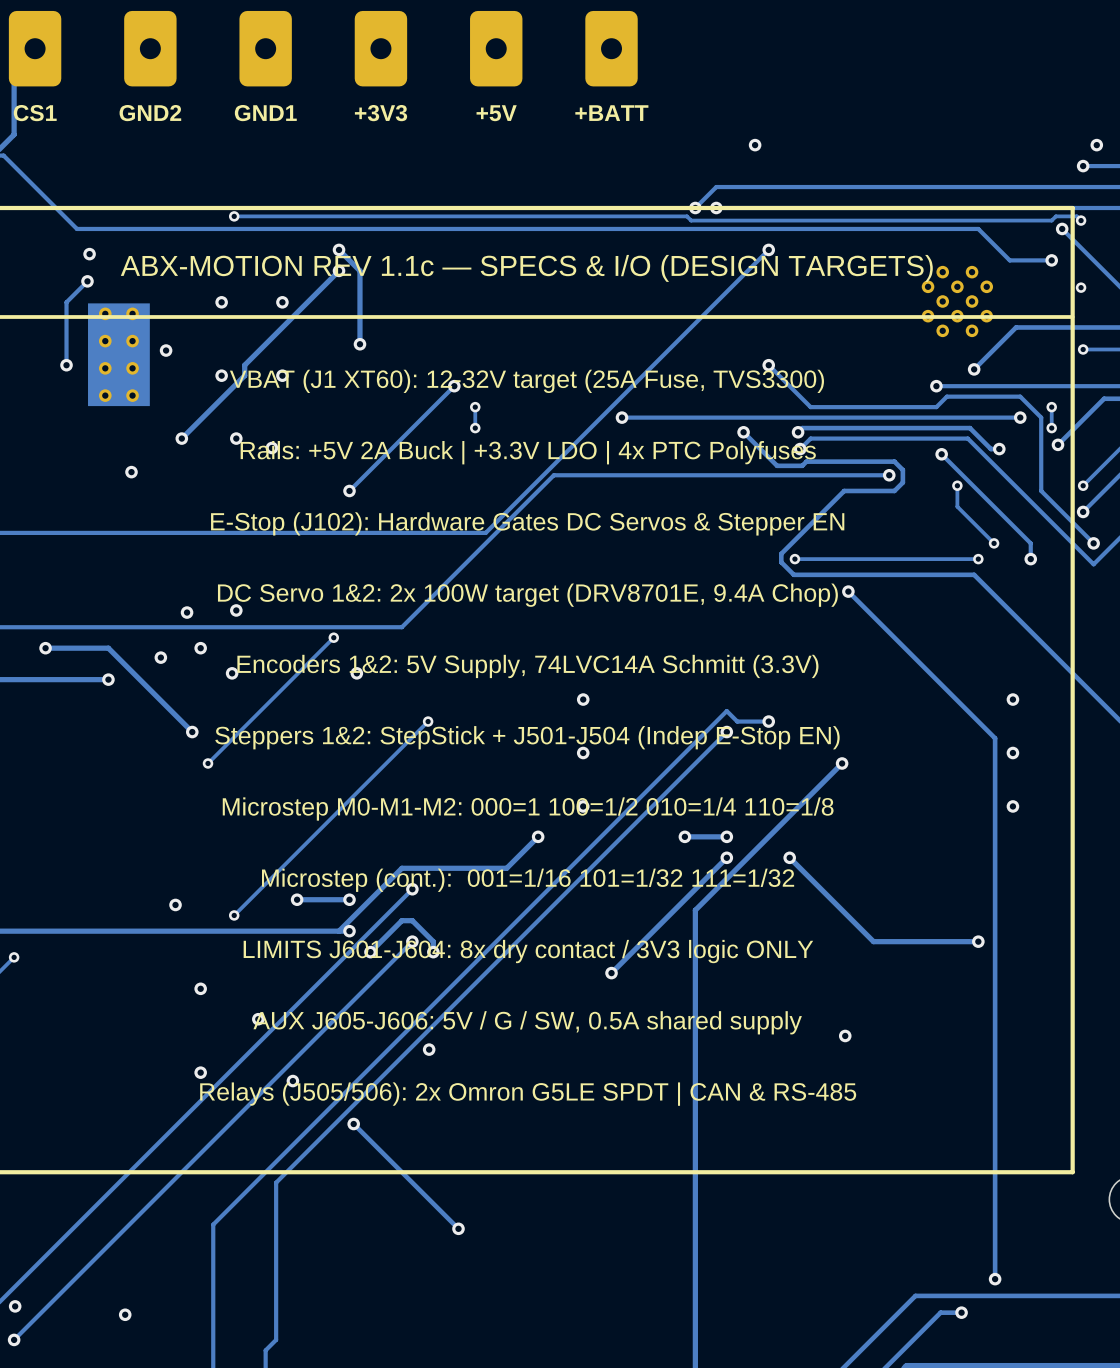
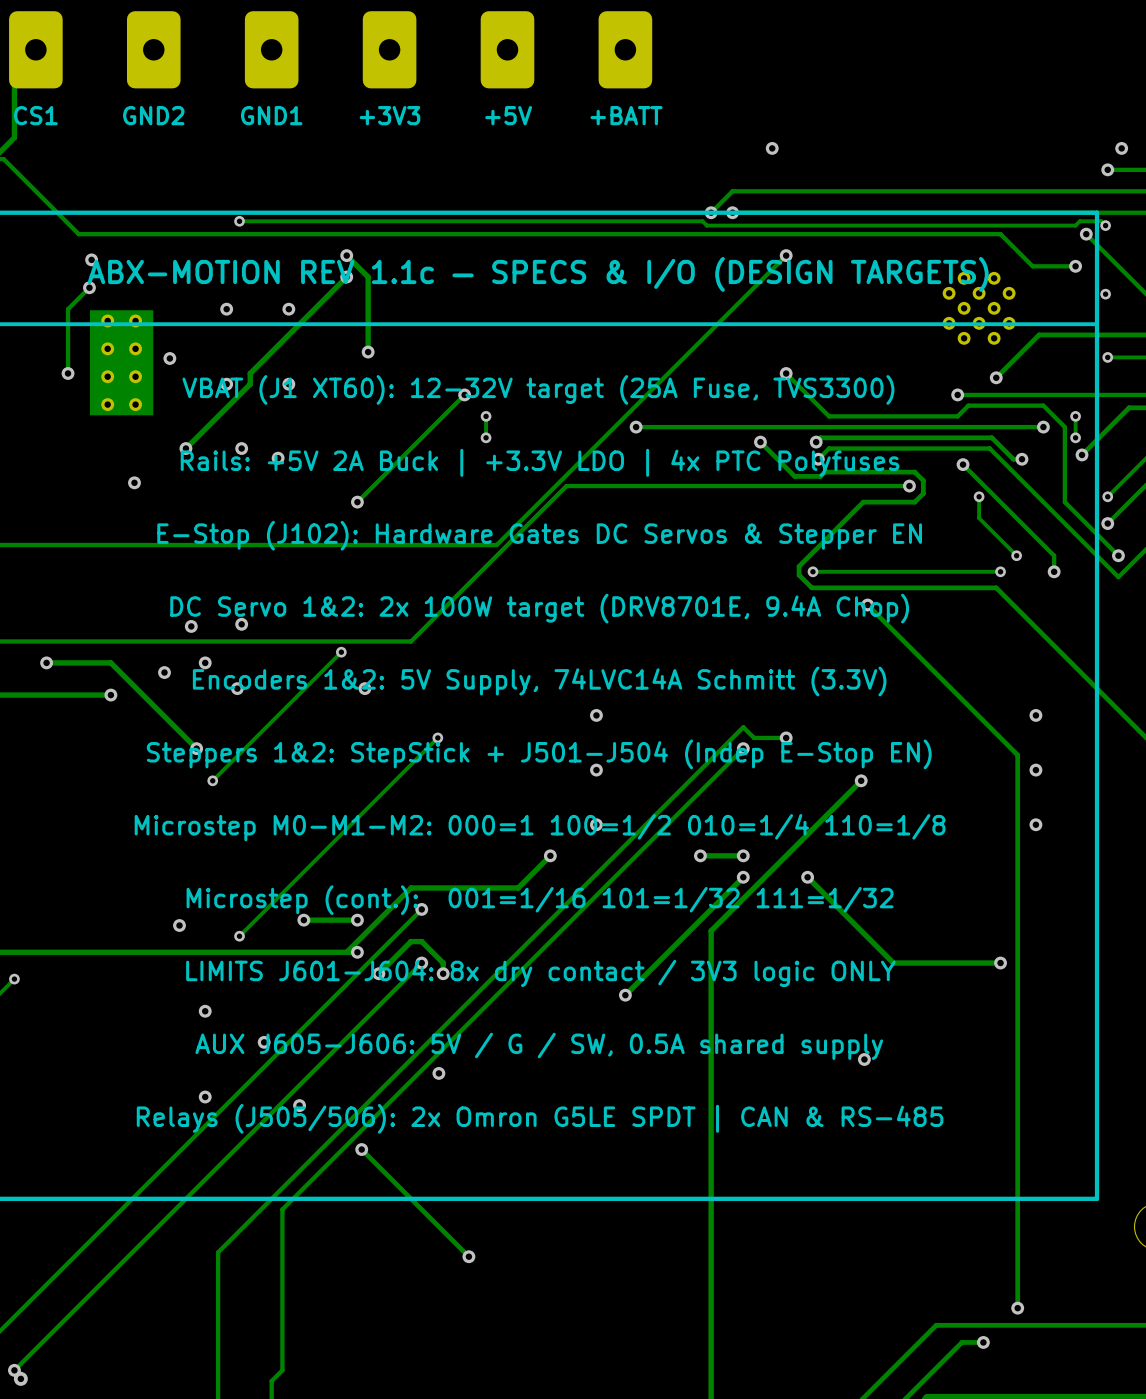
via: (15, 1306) -> none
via: (125, 1314) -> none
via: none -> (20, 1378)

